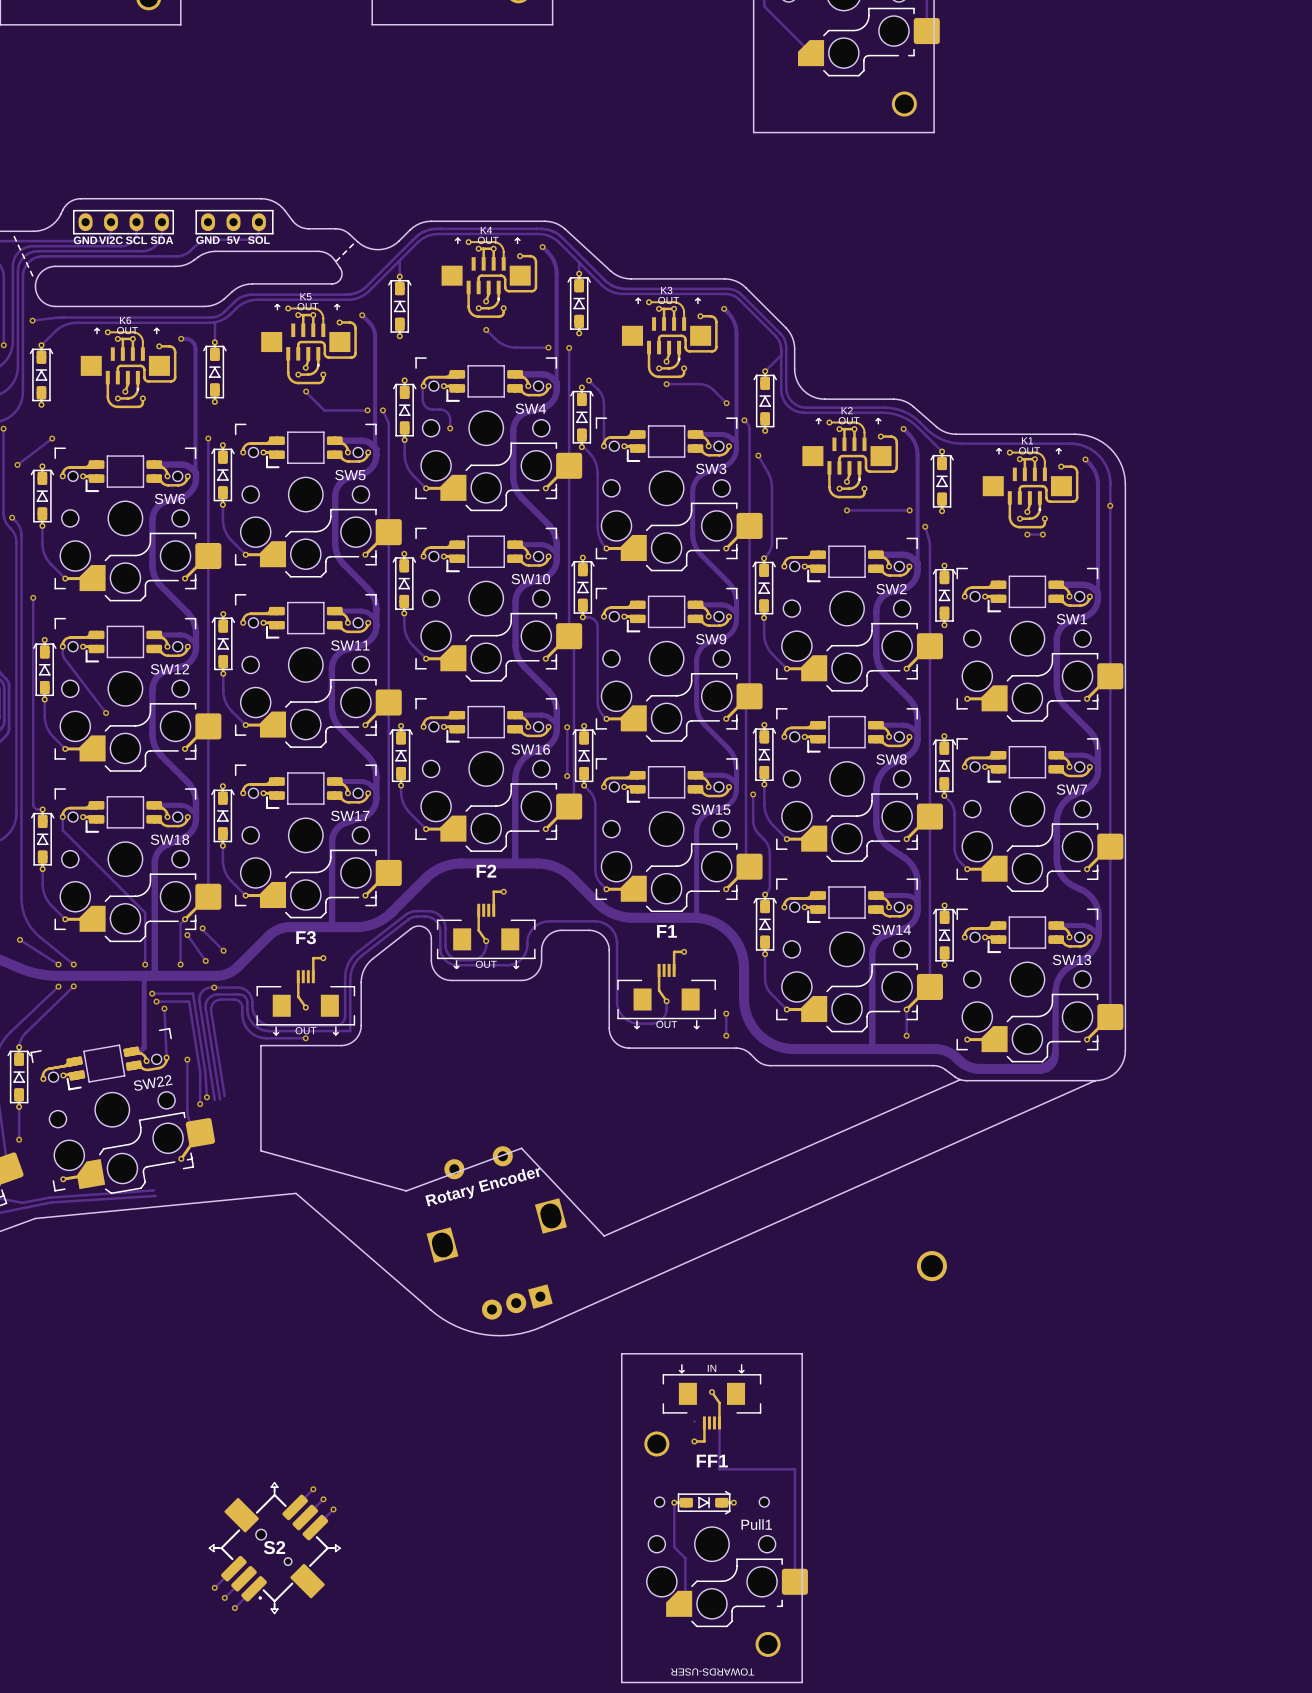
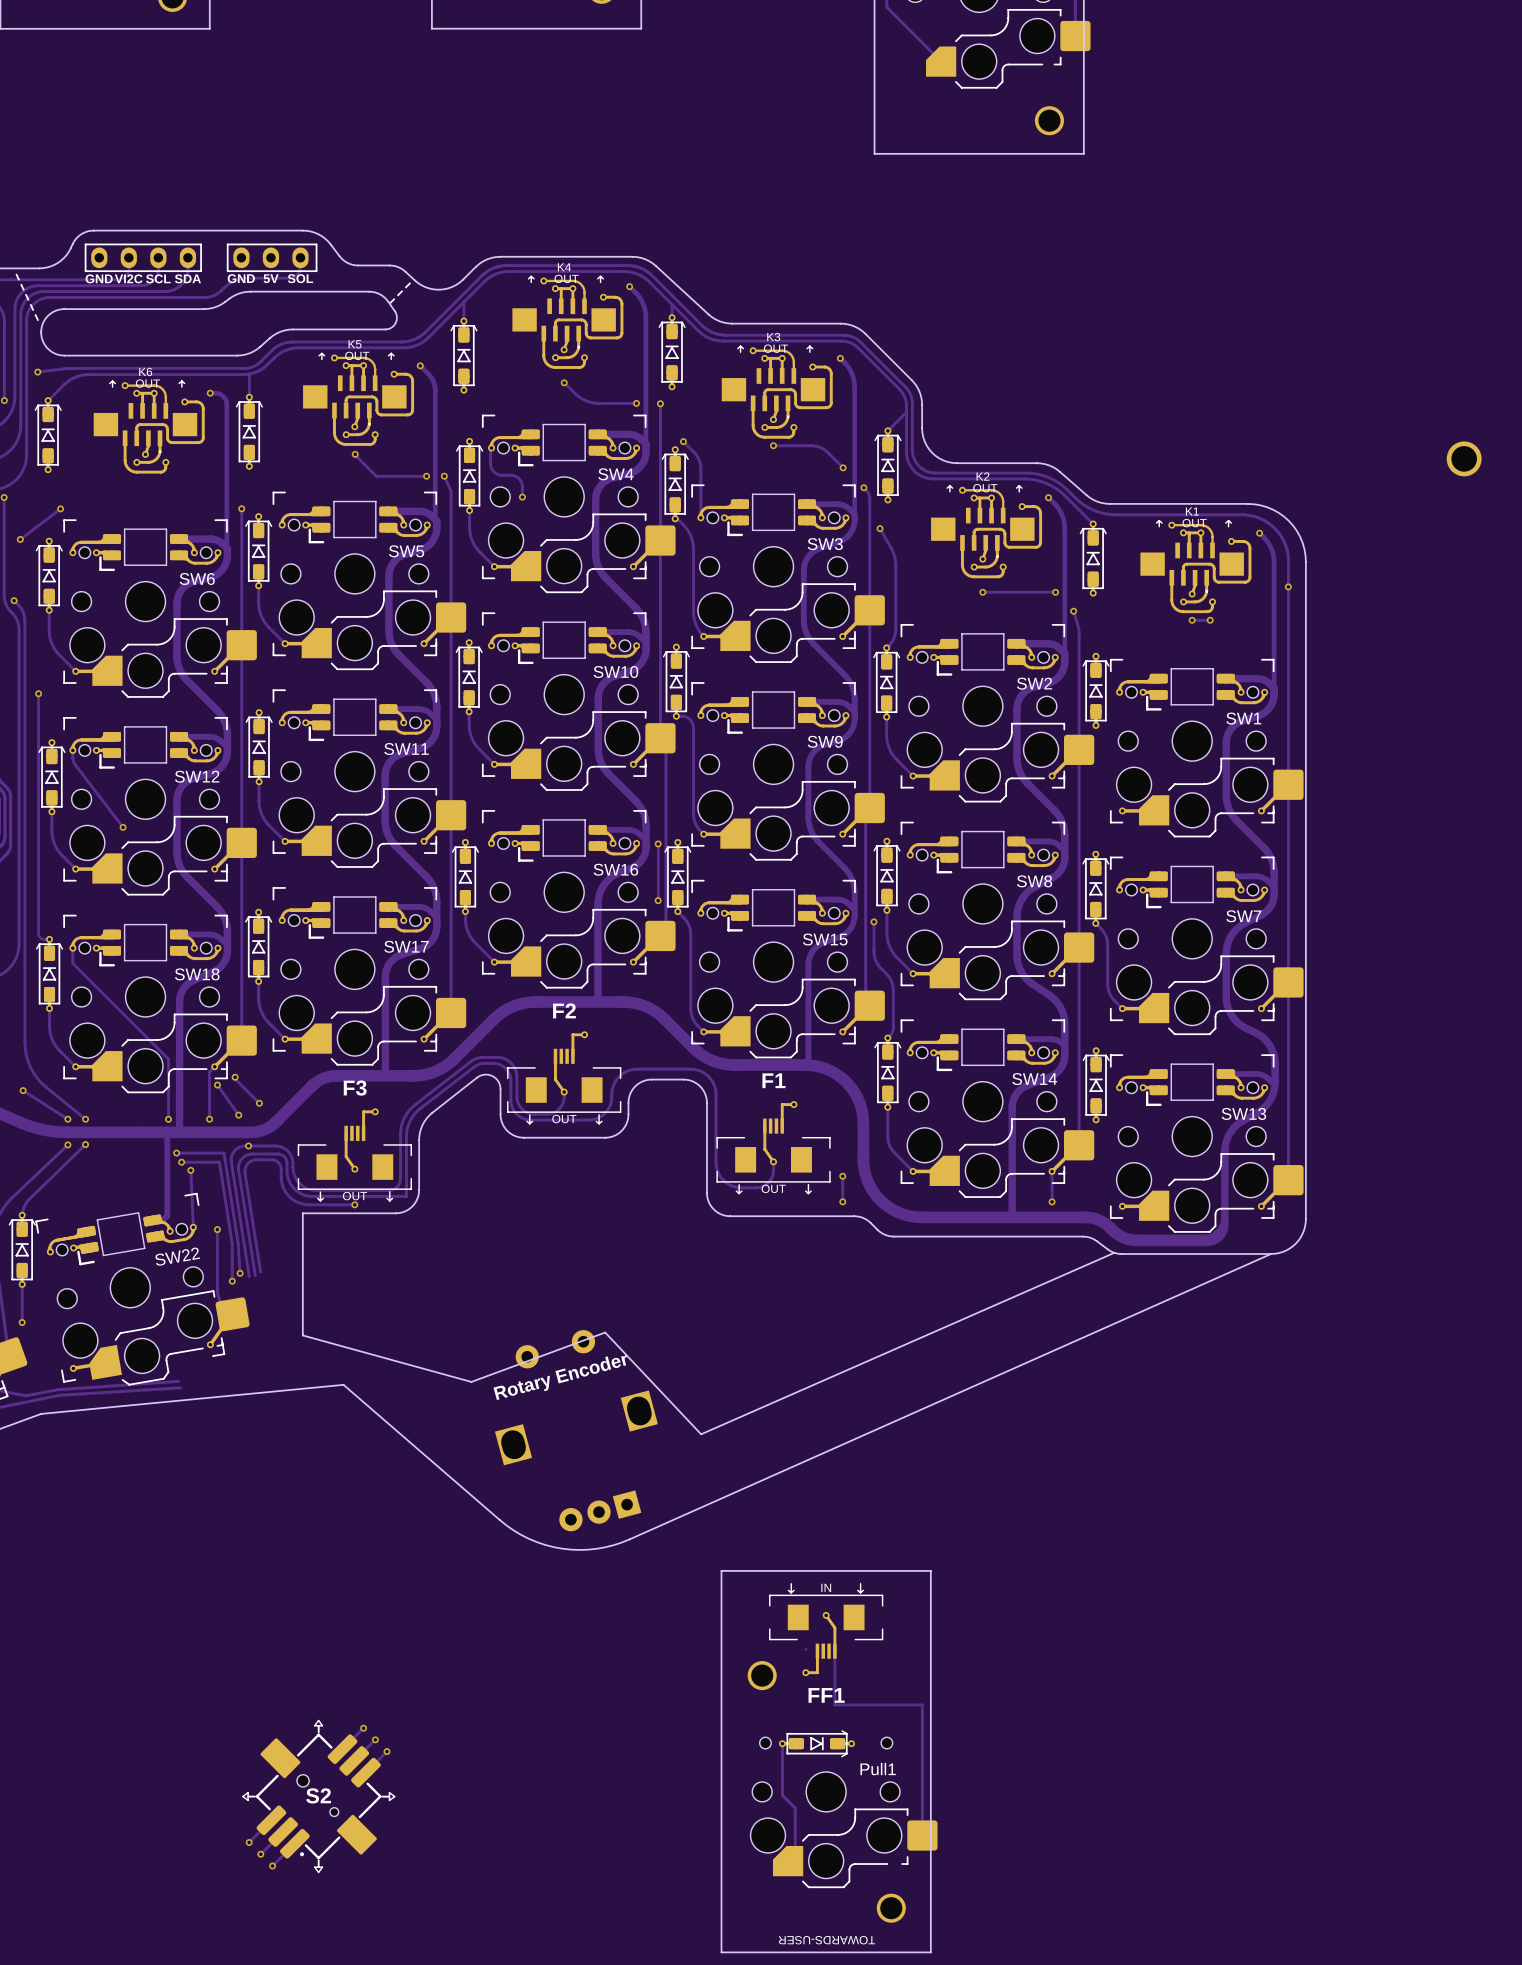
part: none -> (1464, 458)
part: (931, 1266) -> none

